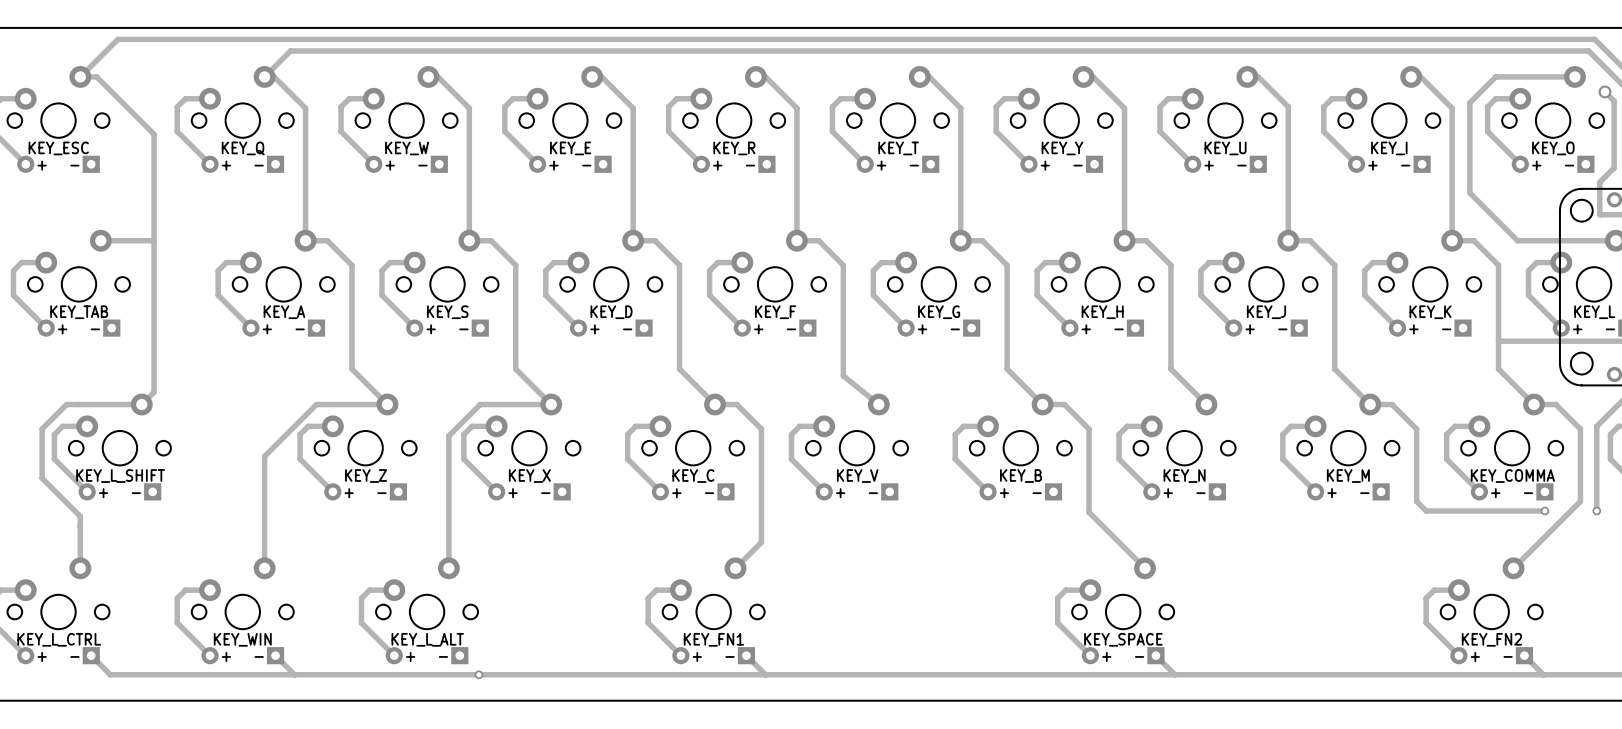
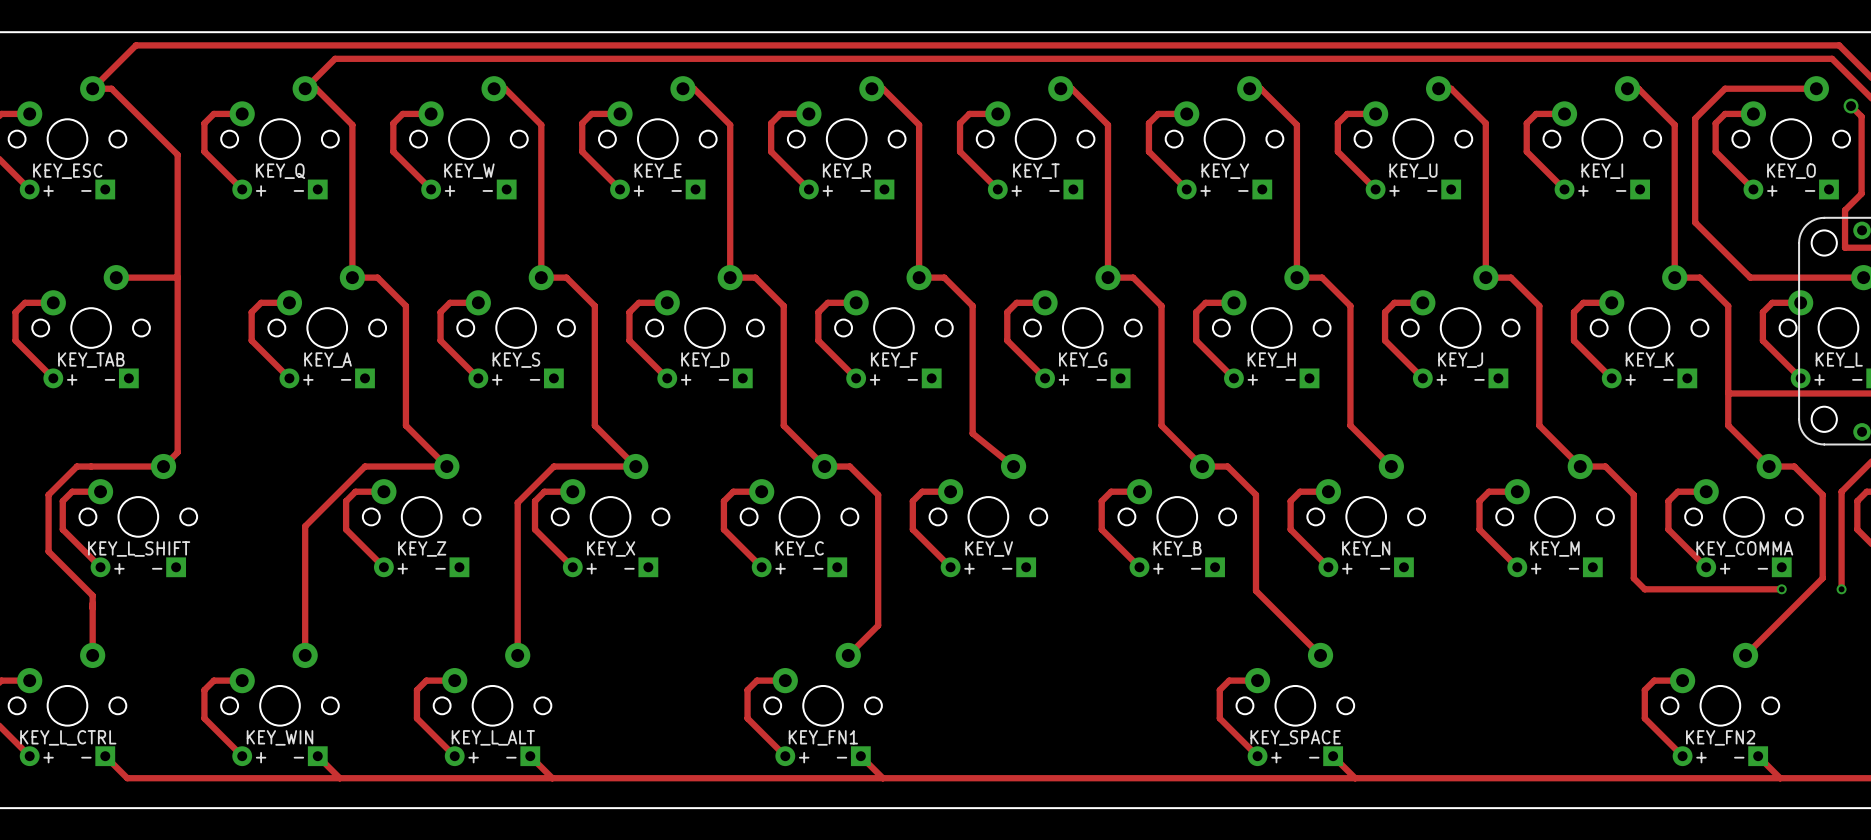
track: none -> (530, 756) (552, 778)
via: (478, 674) -> none

